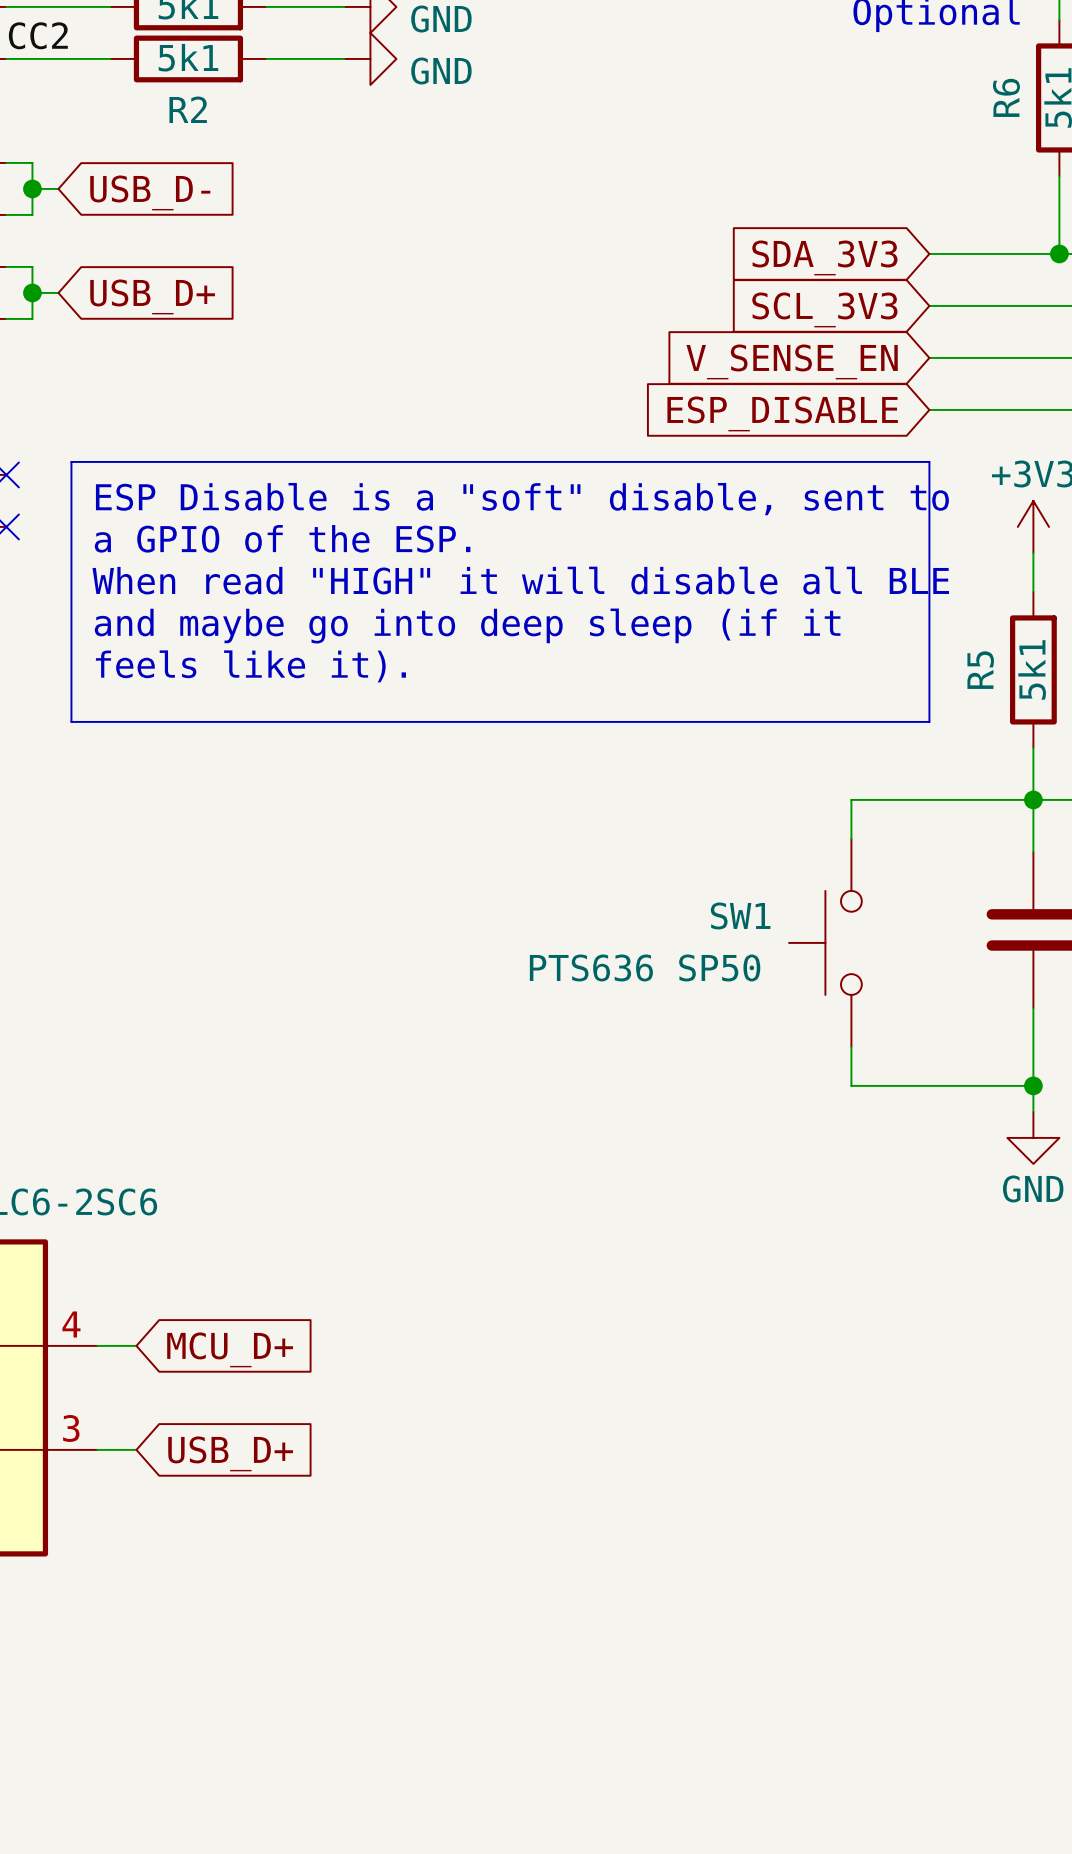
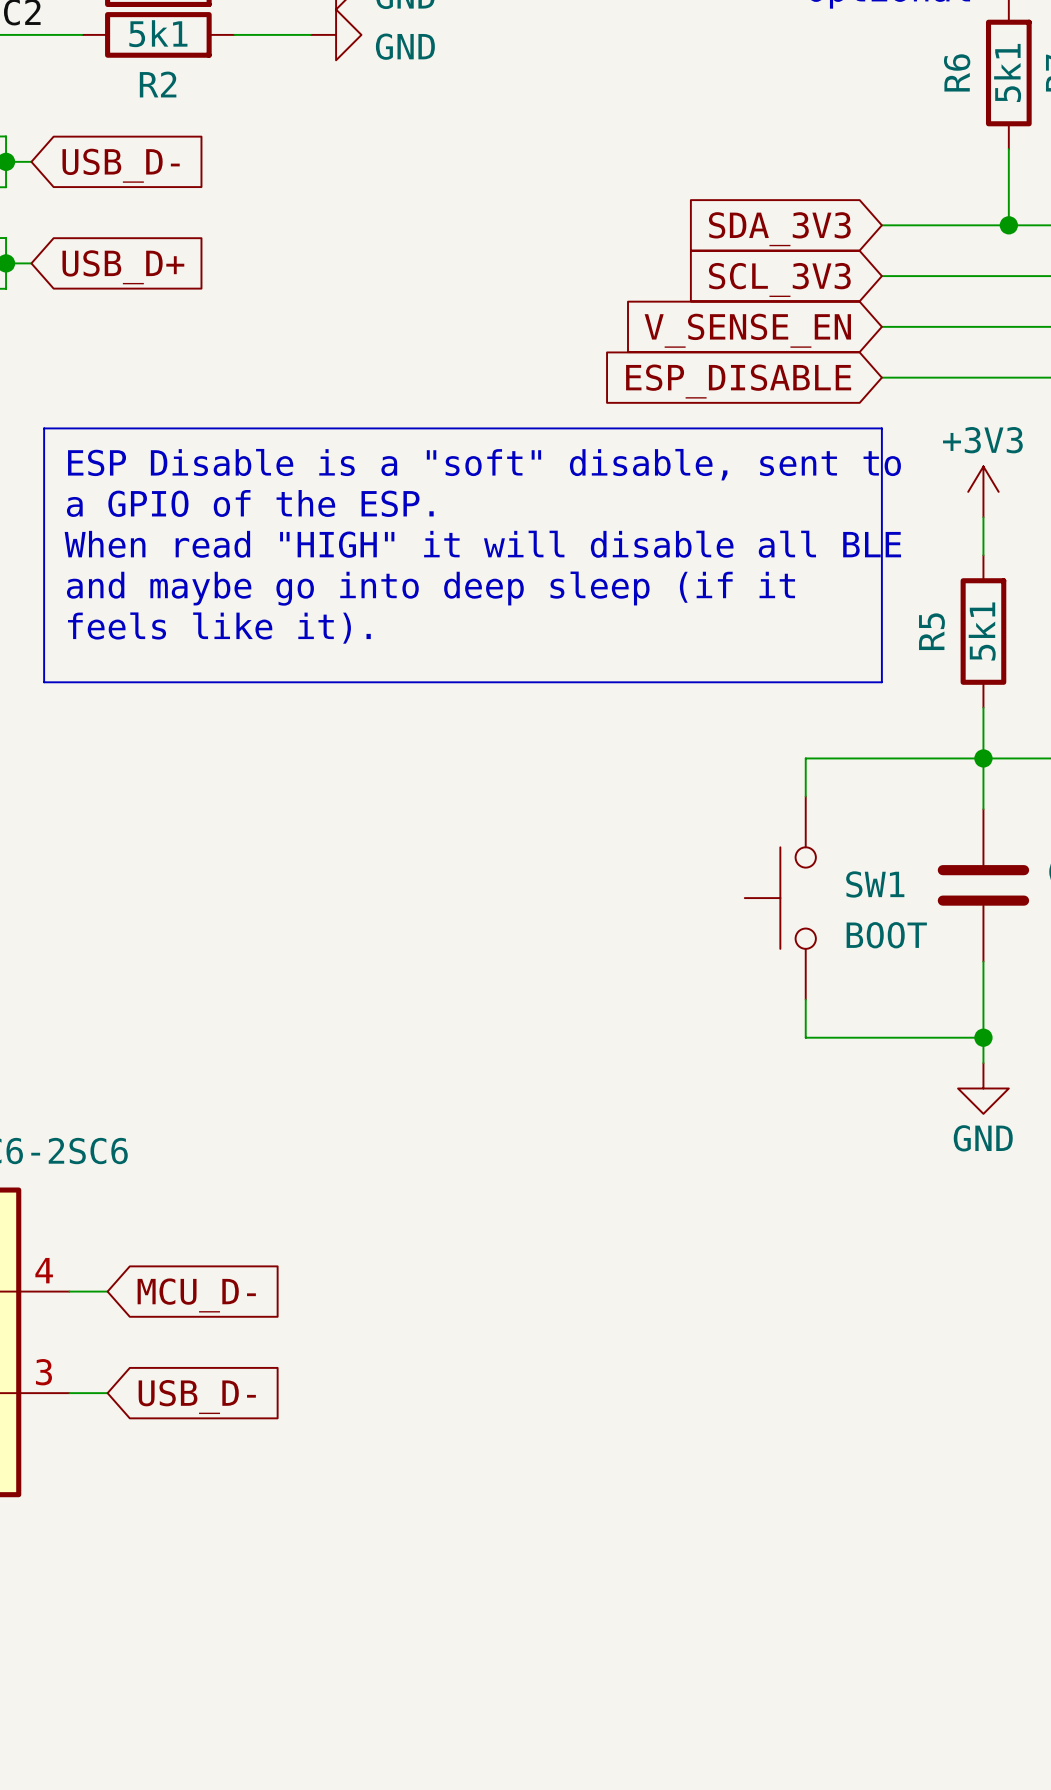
SW1 name position: SW1 (740, 915) -> SW1 (875, 884)
SW1 value: PTS636 SP50 (645, 967) -> BOOT (886, 935)
global label: MCU_D+ (230, 1349) -> MCU_D- (196, 1295)
global label: USB_D+ (230, 1453) -> USB_D- (197, 1397)

